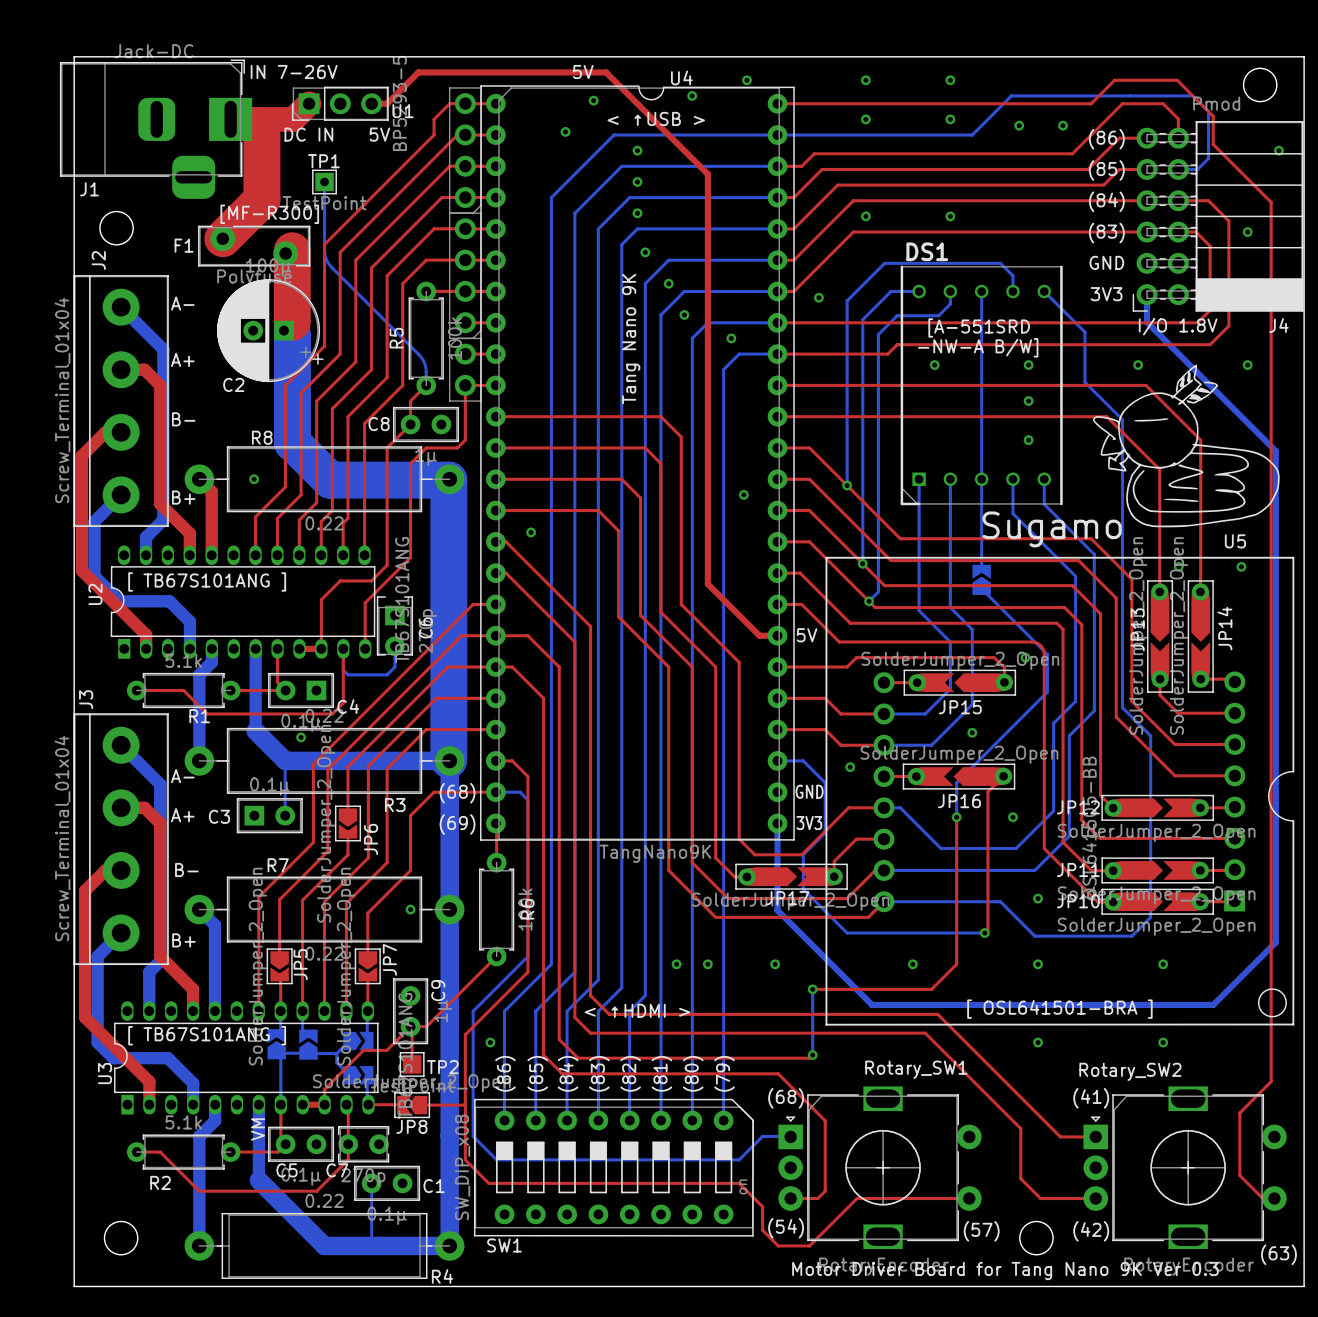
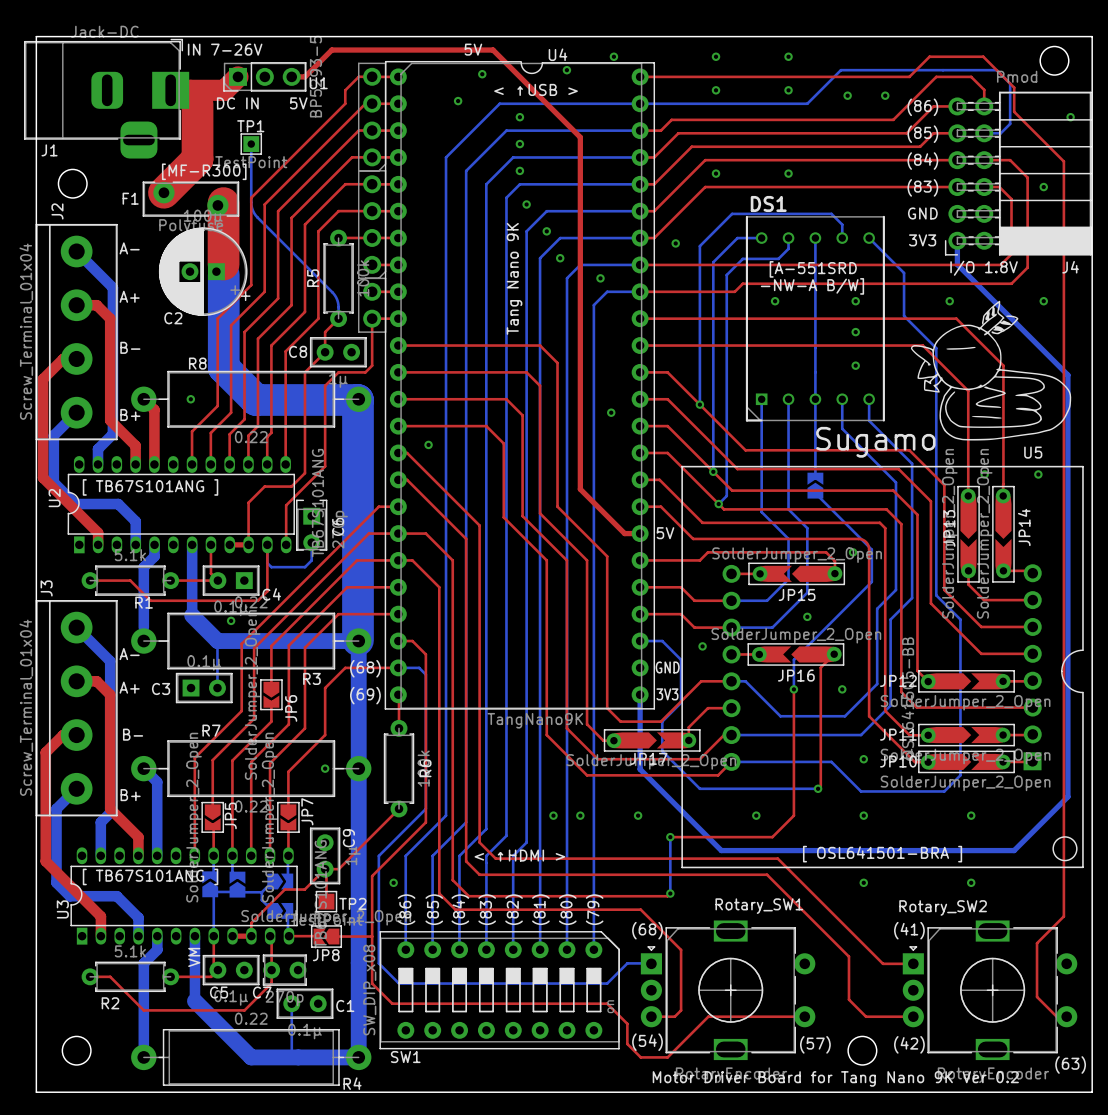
text: Motor Driver Board for Tang Nano 9K Ver 0.3 (1005, 1271) -> Motor Driver Board for Tang Nano 9K Ver 0.2 (835, 1078)

